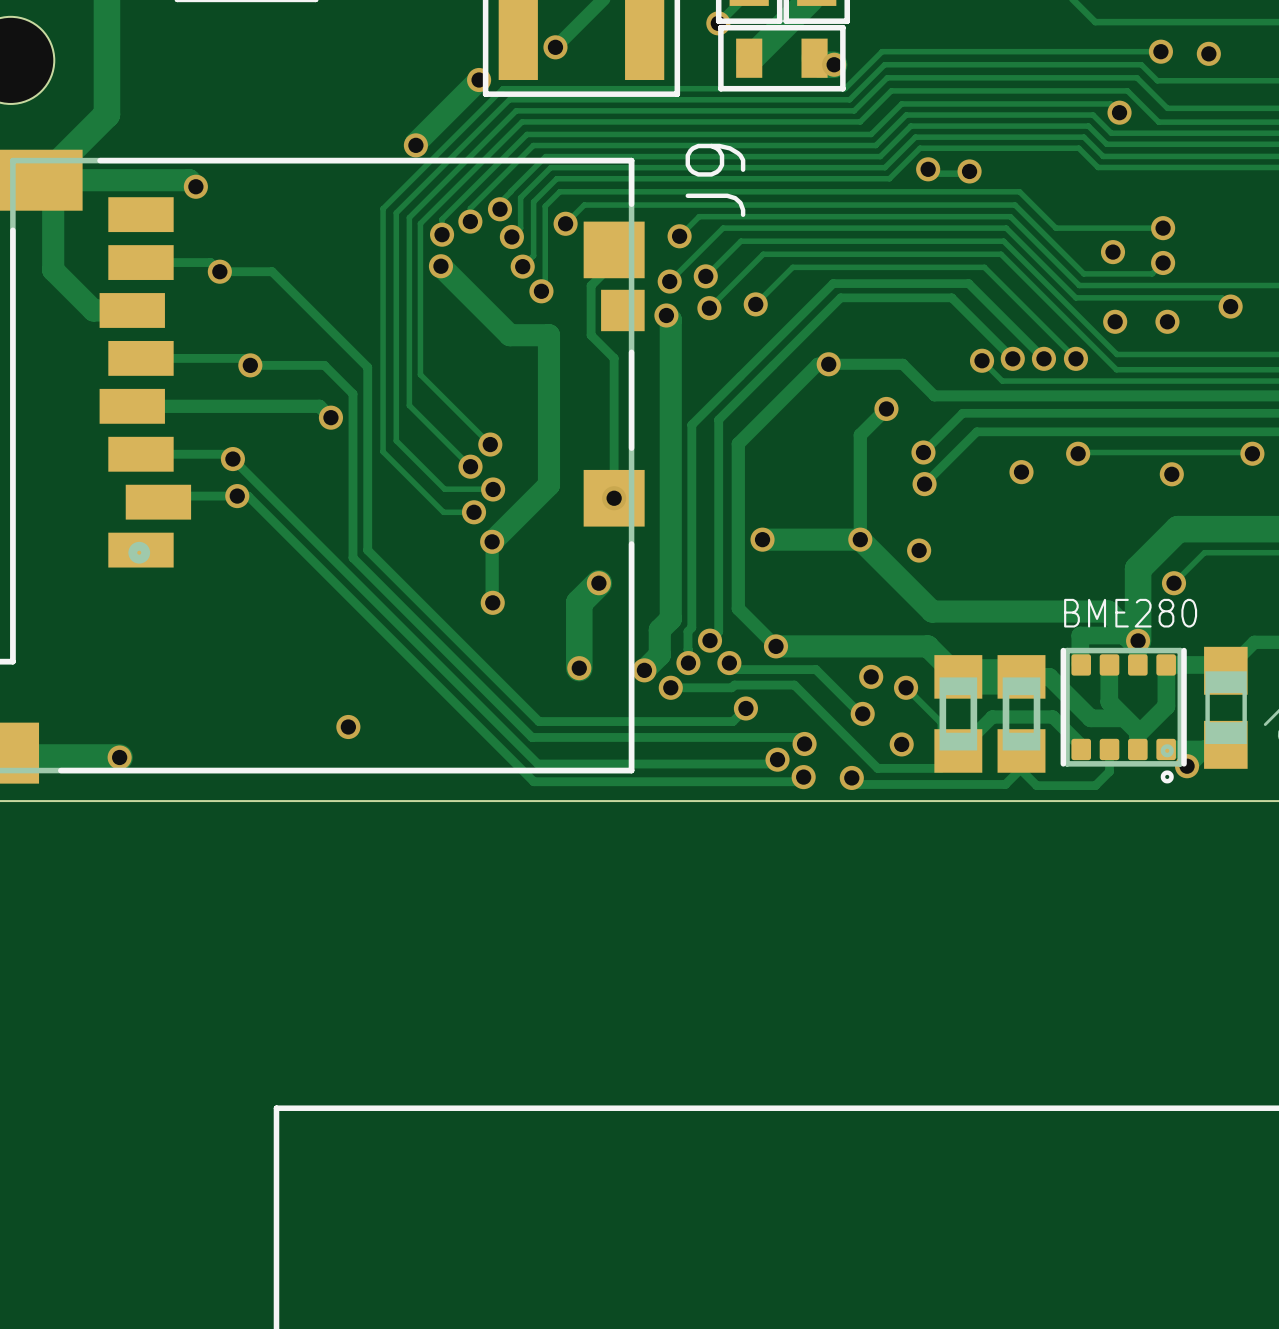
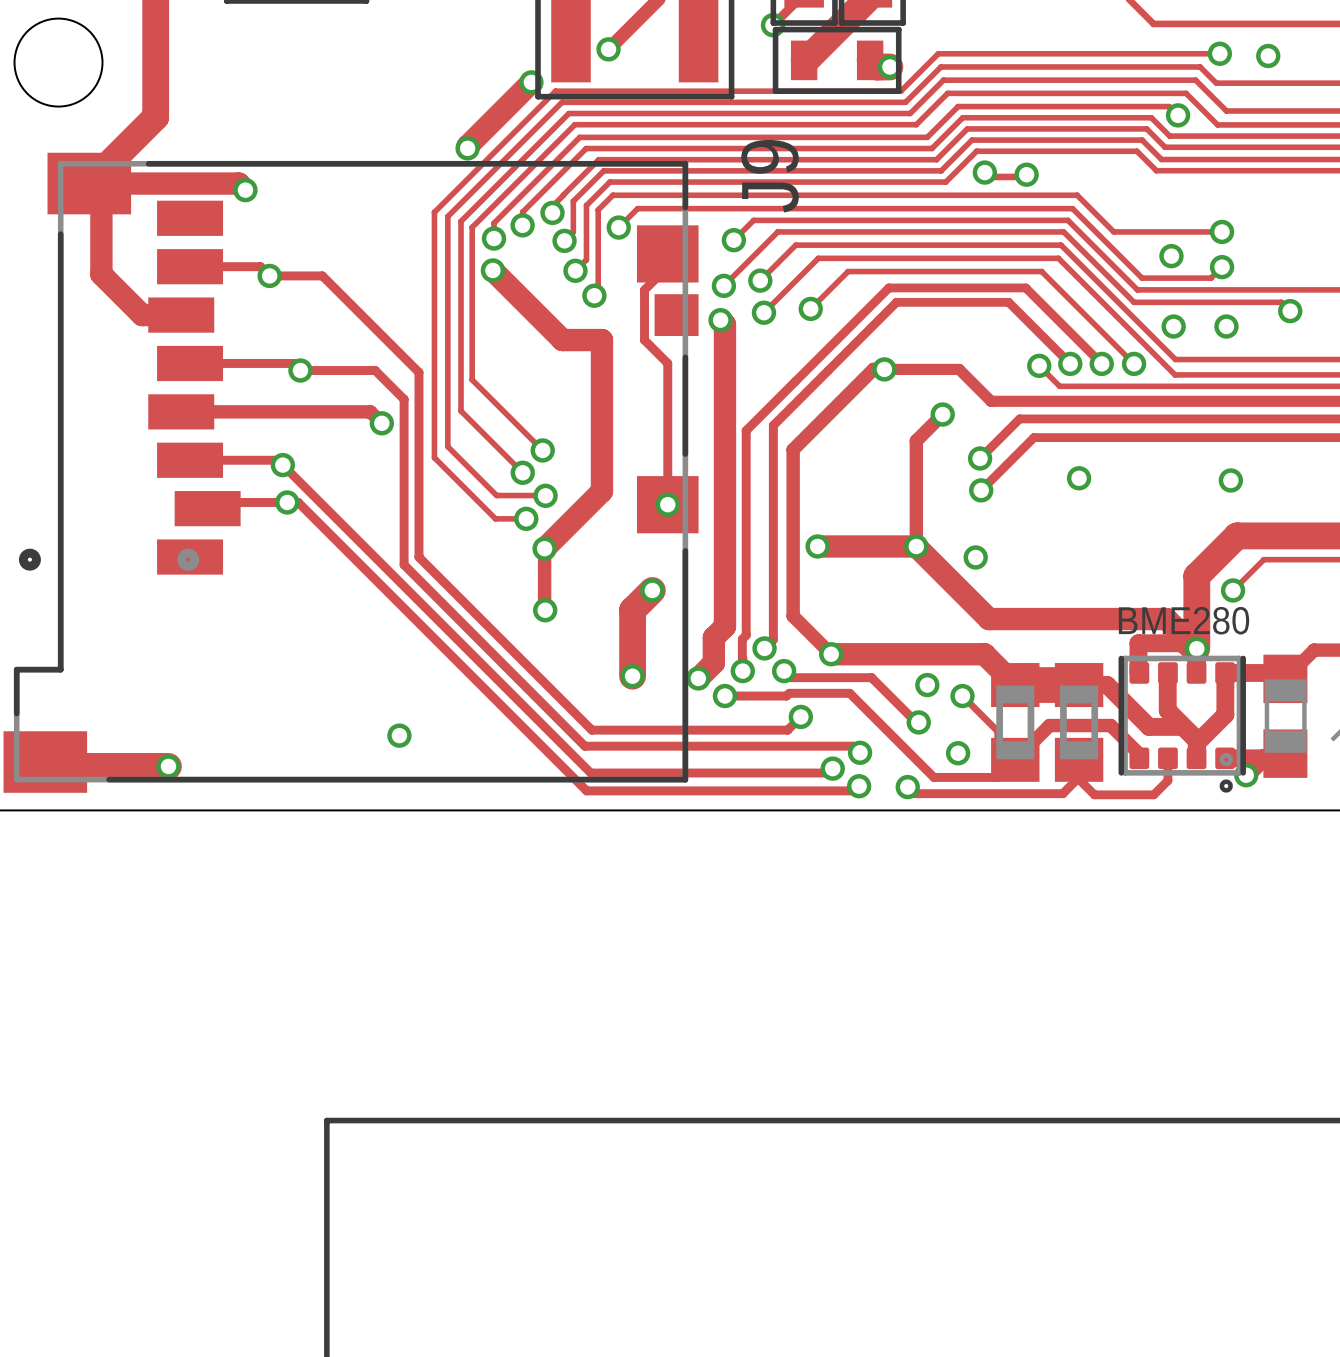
track: (1078, 453) (1252, 453) -> none
via: (1078, 453) -> none
via: (1252, 453) -> none

